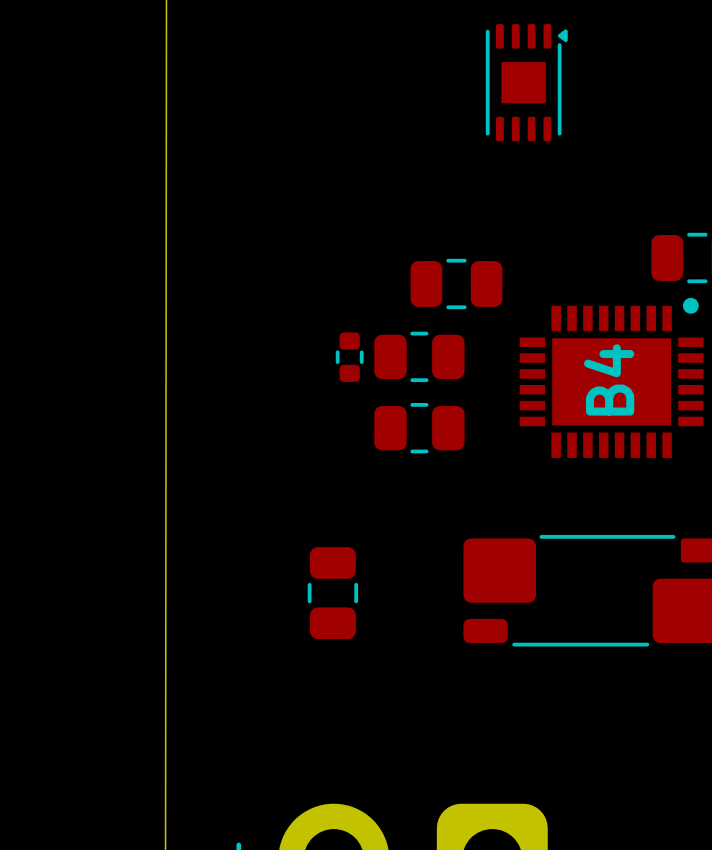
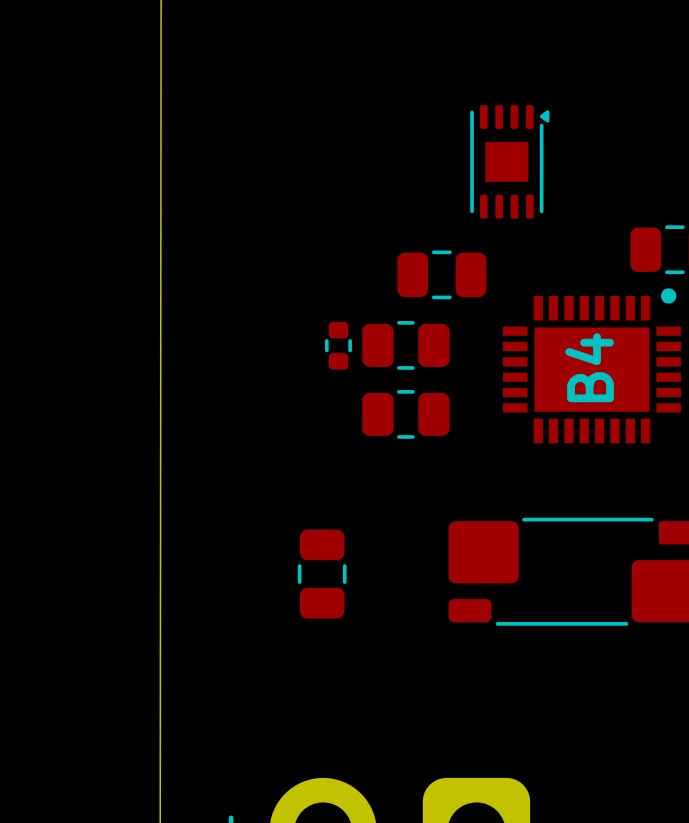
part position: (526, 82) -> (509, 161)

